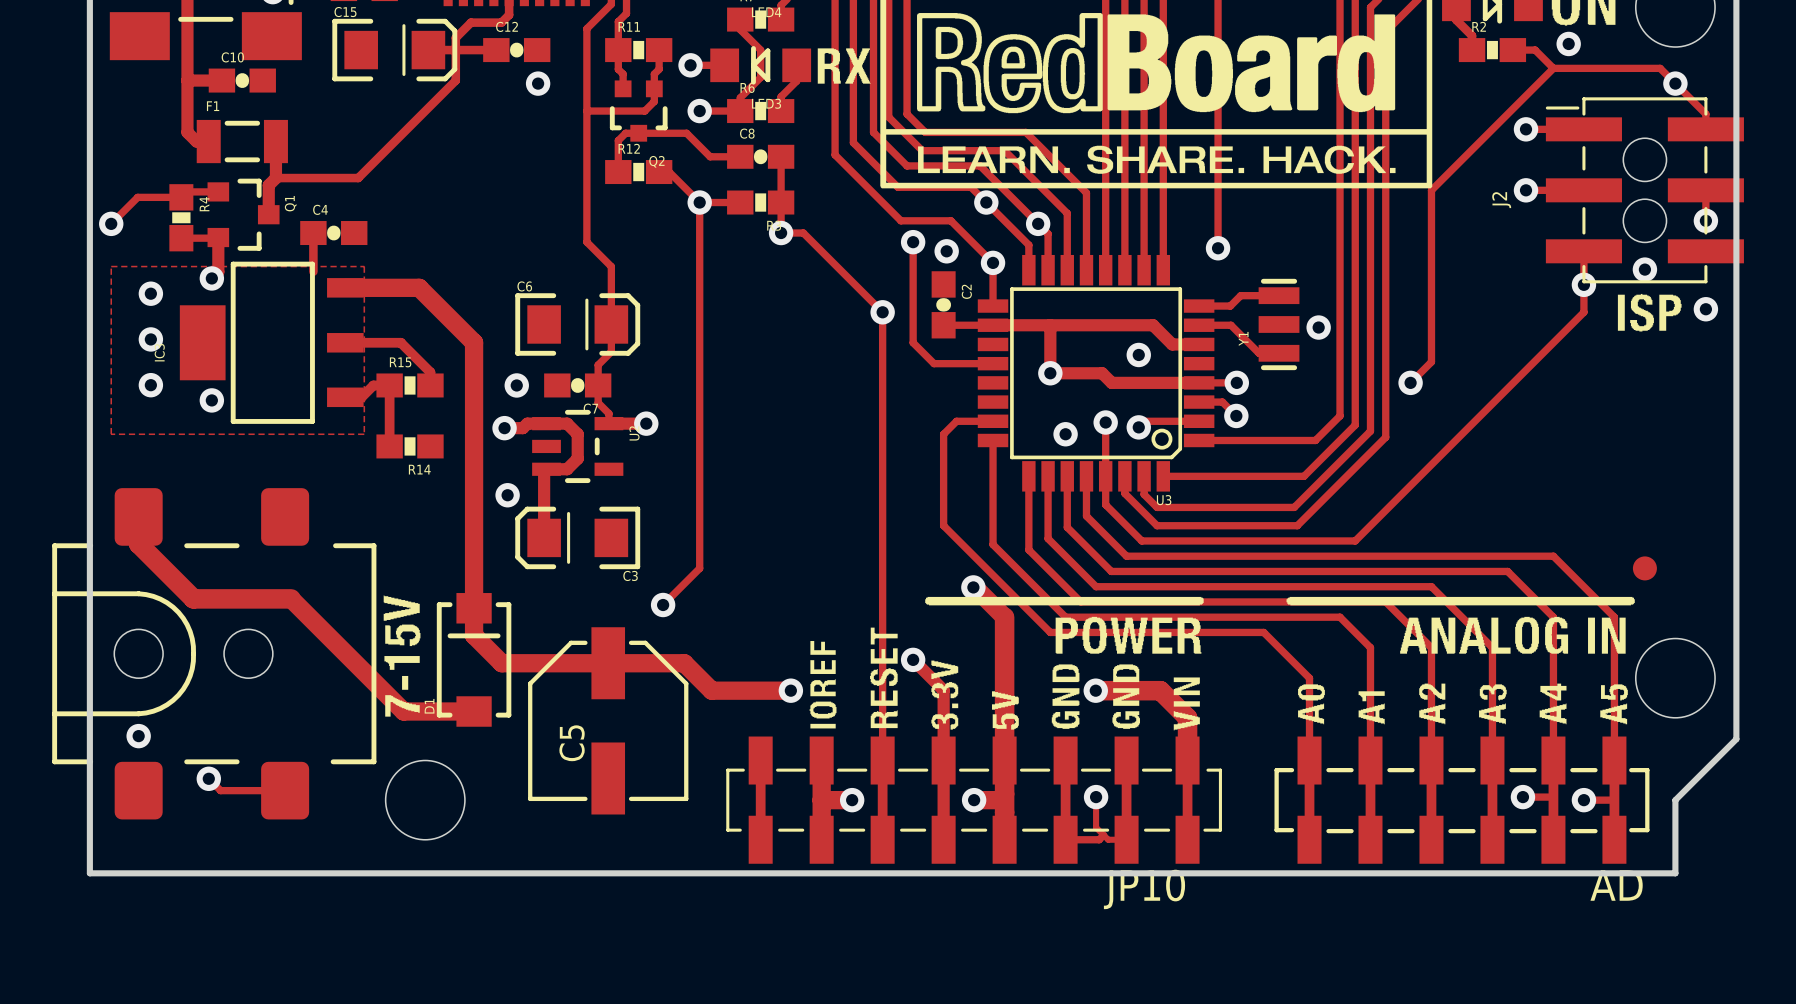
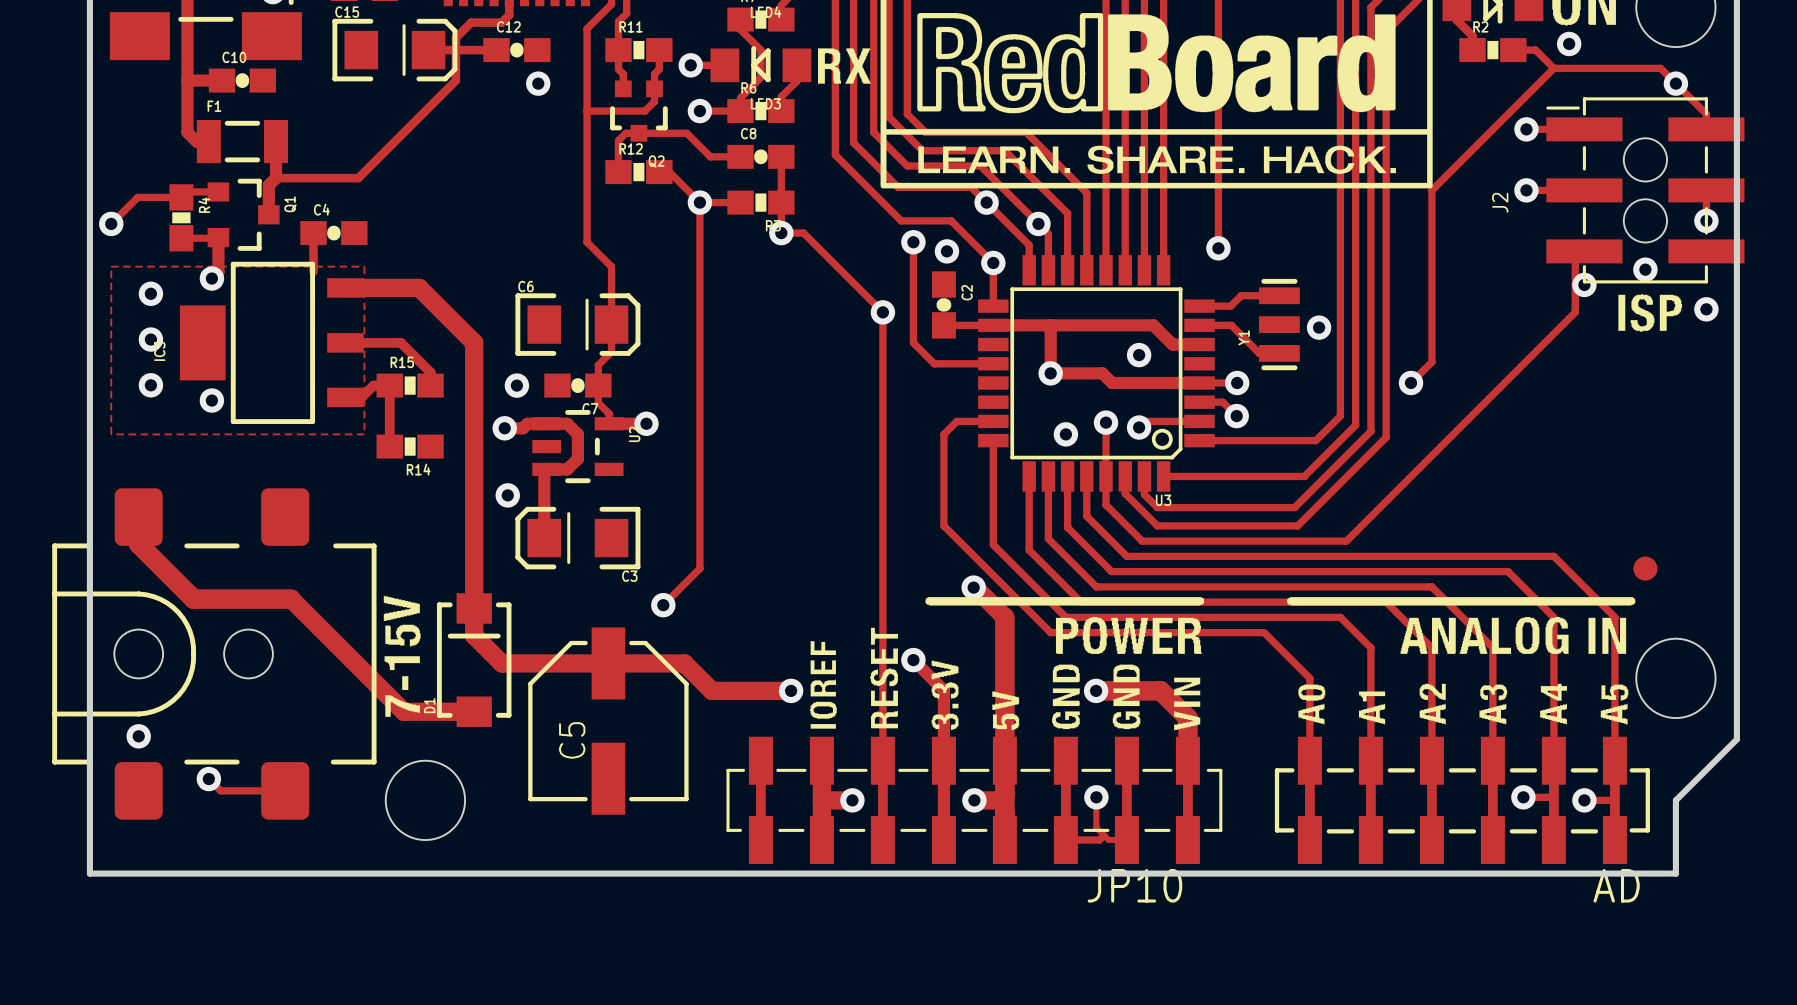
track: (1602, 251) (1583, 251) (1583, 312) (1355, 540) (1346, 540) -> (1576, 251) (1575, 253) (1575, 312) (1346, 541)

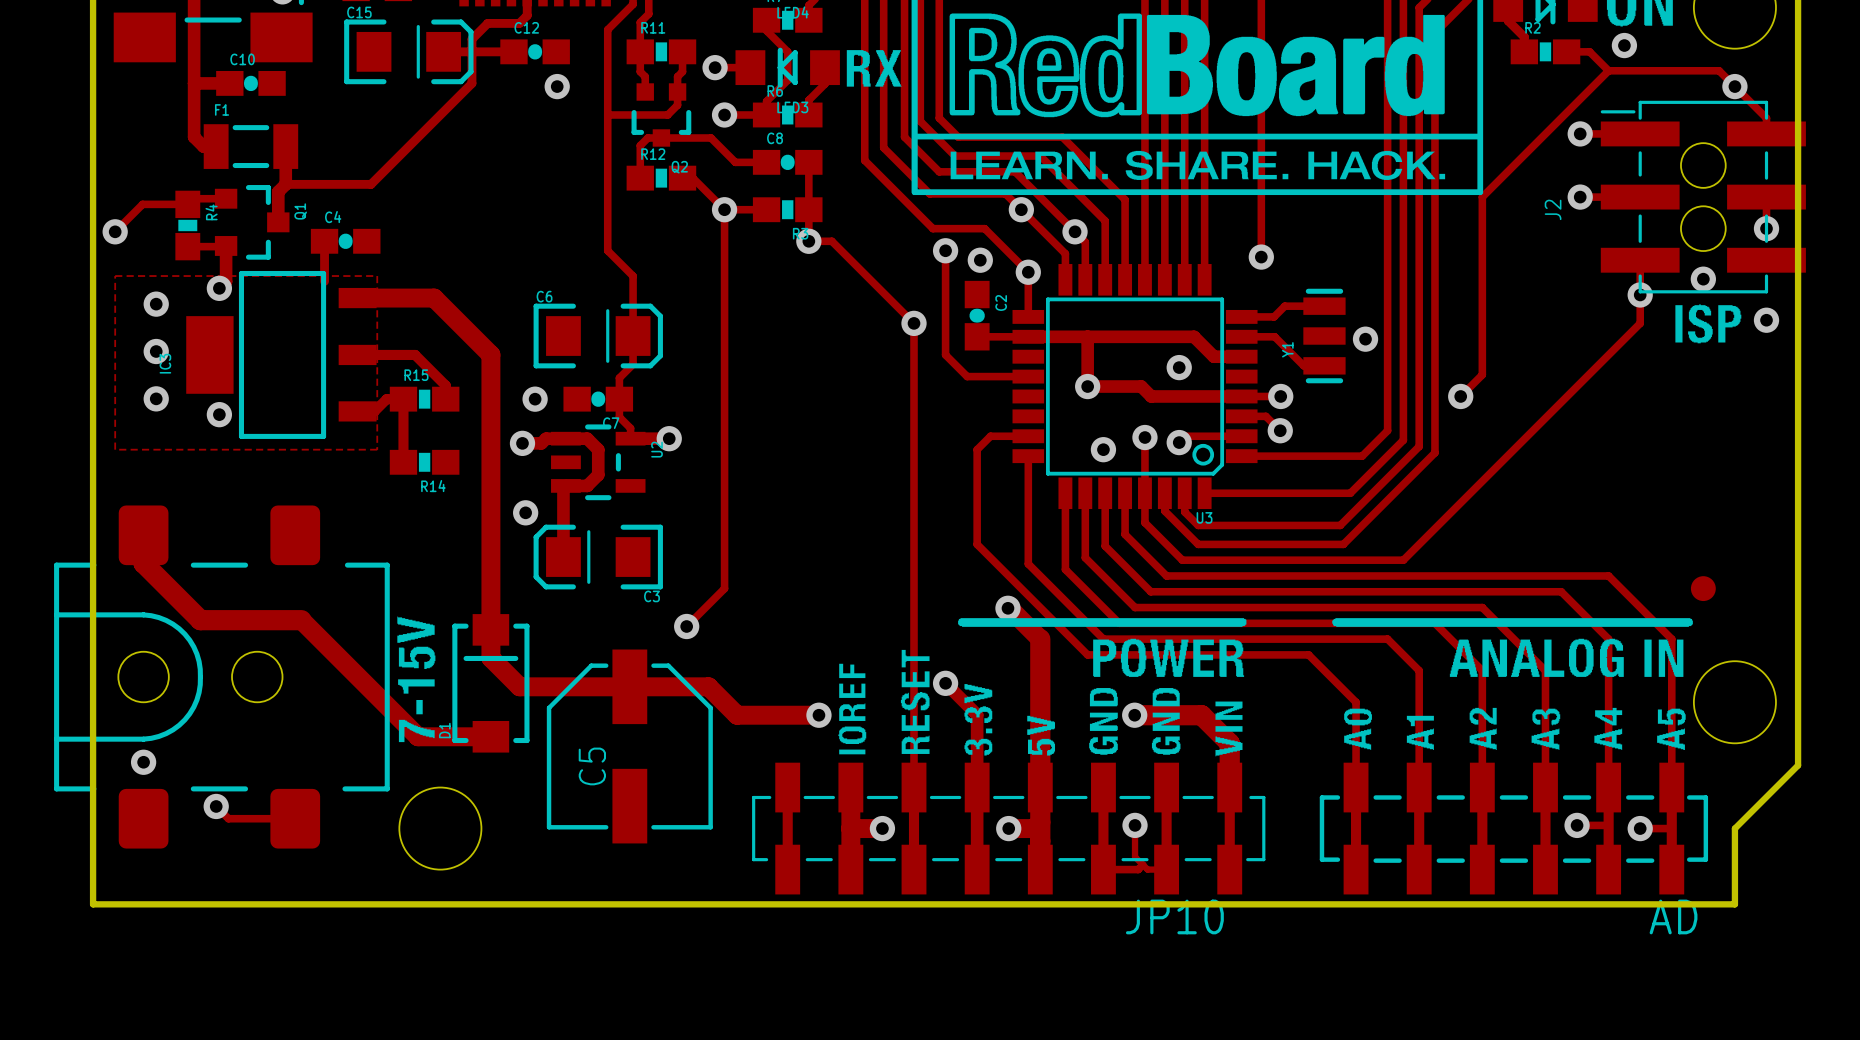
track: (1576, 251) (1575, 253) (1575, 312) (1346, 541) -> (1659, 260) (1640, 260) (1640, 323) (1403, 560) (1393, 560)

